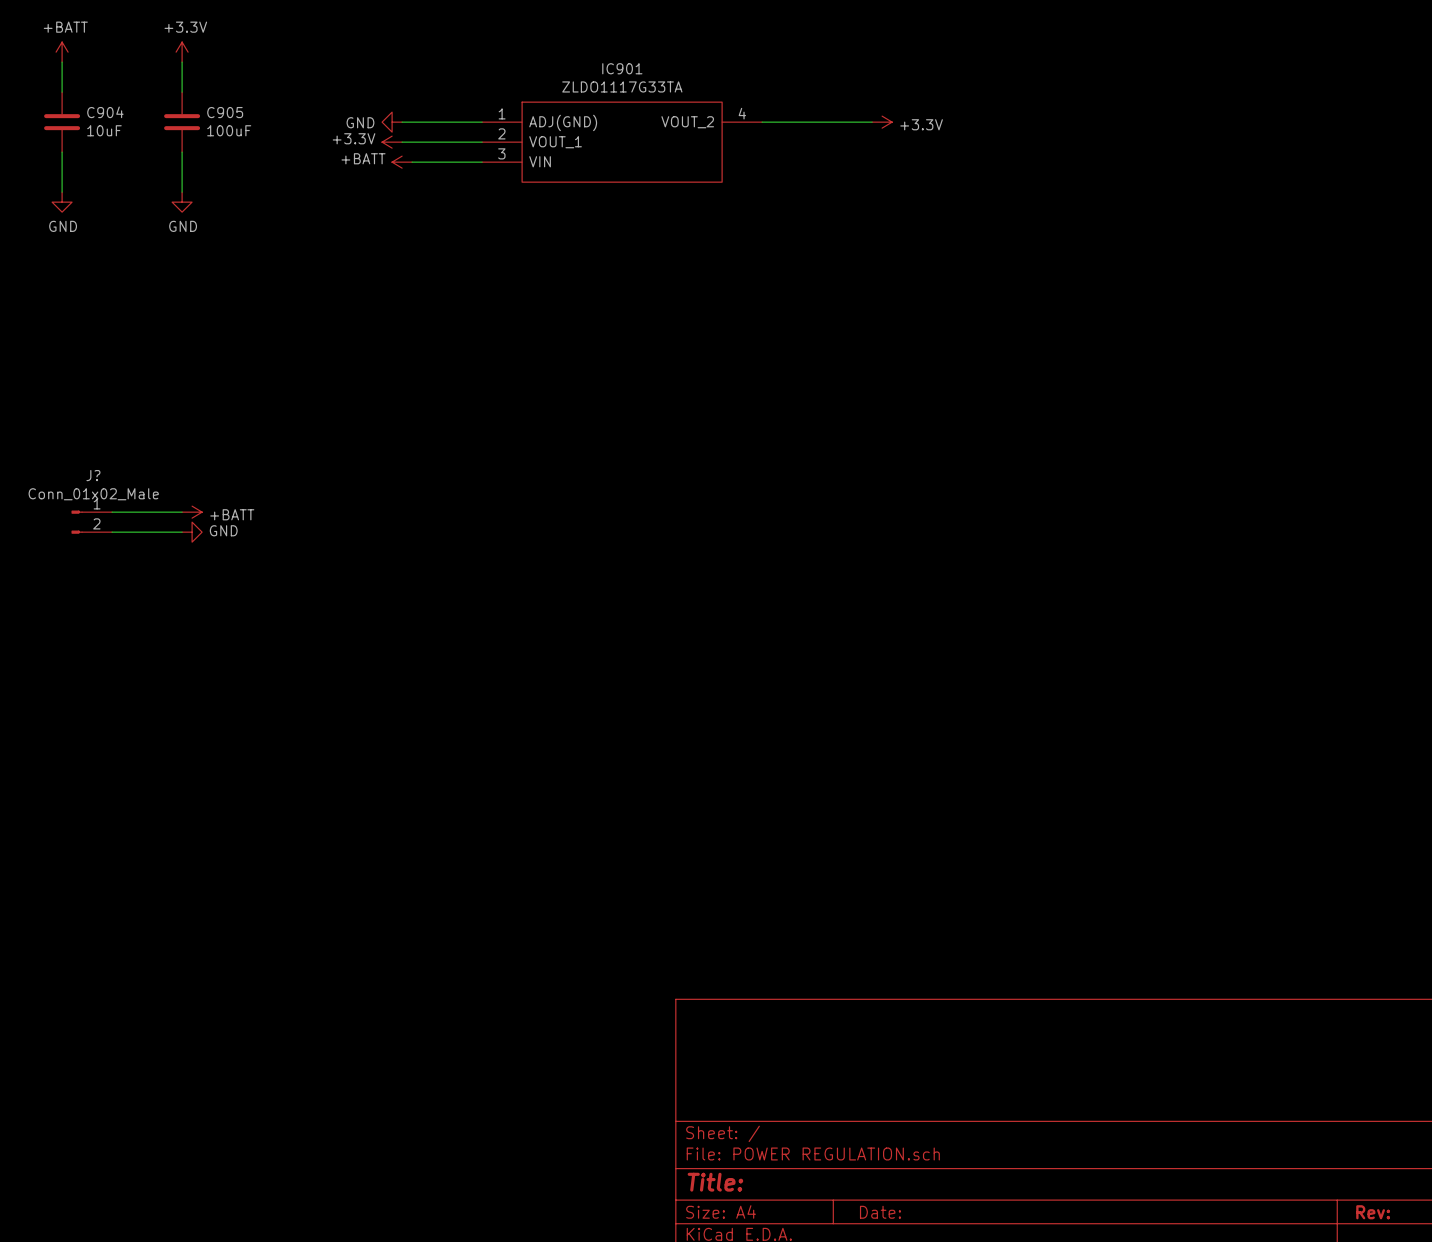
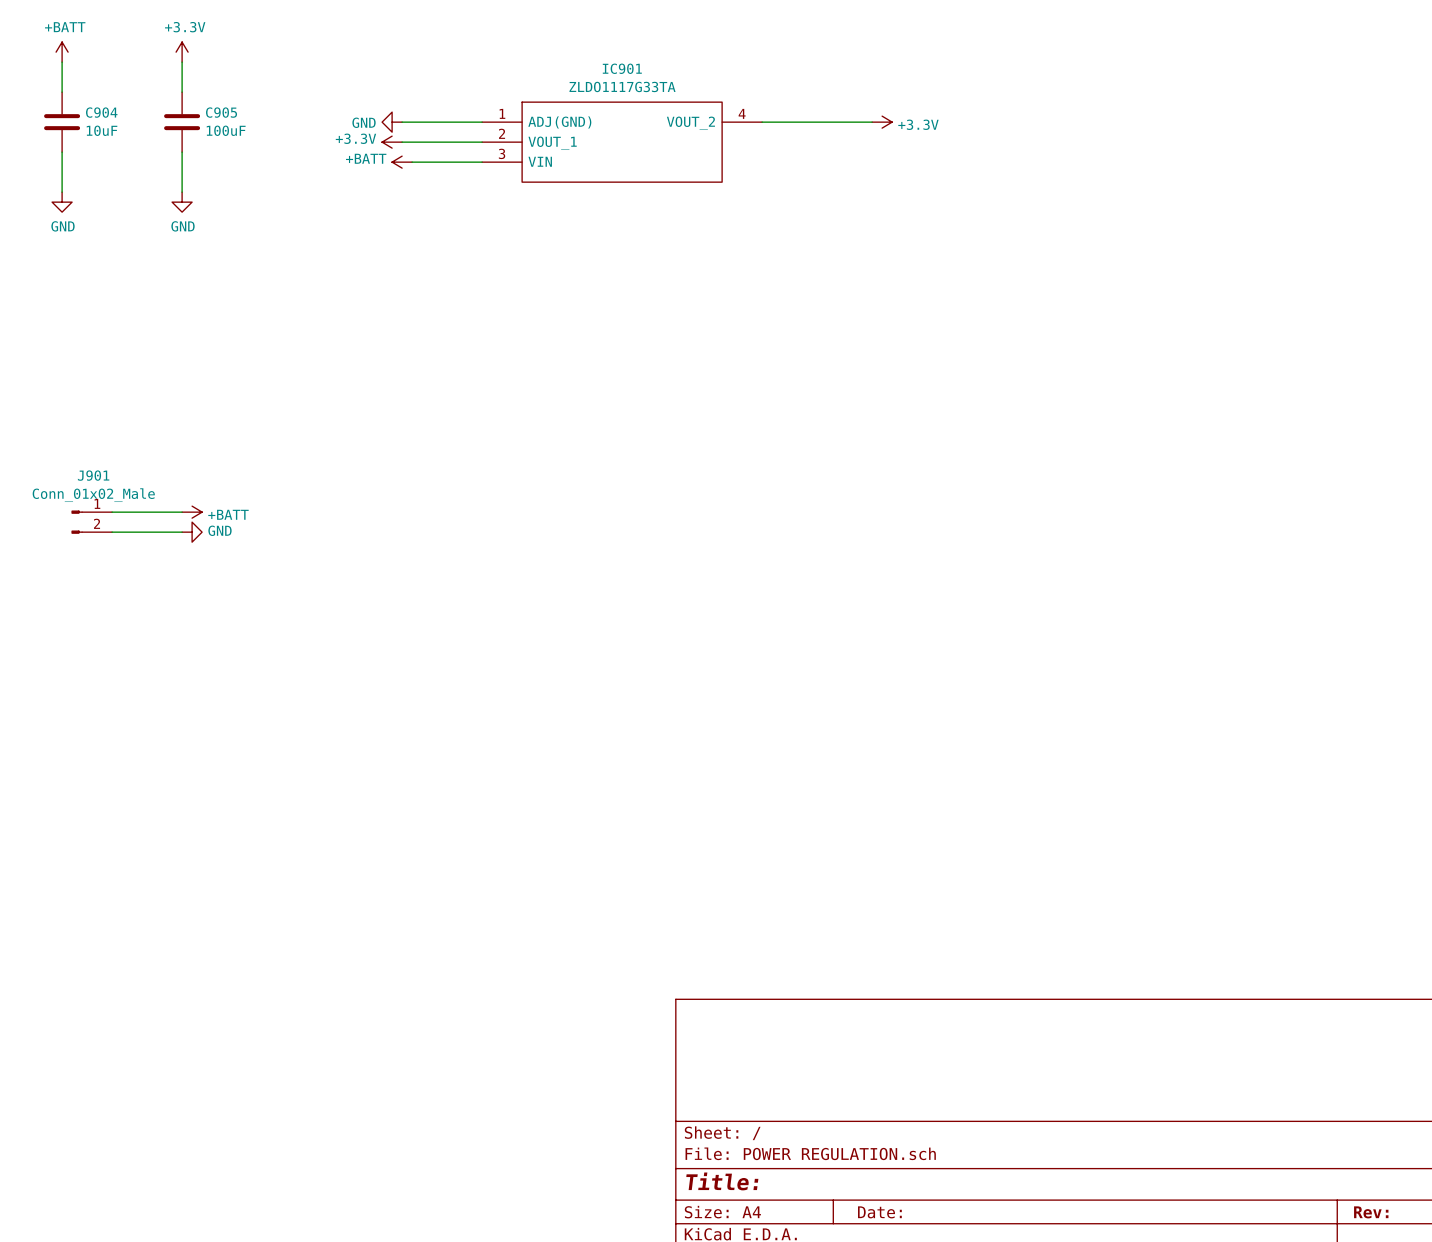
J? name: J? (93, 475) -> J901 (93, 475)

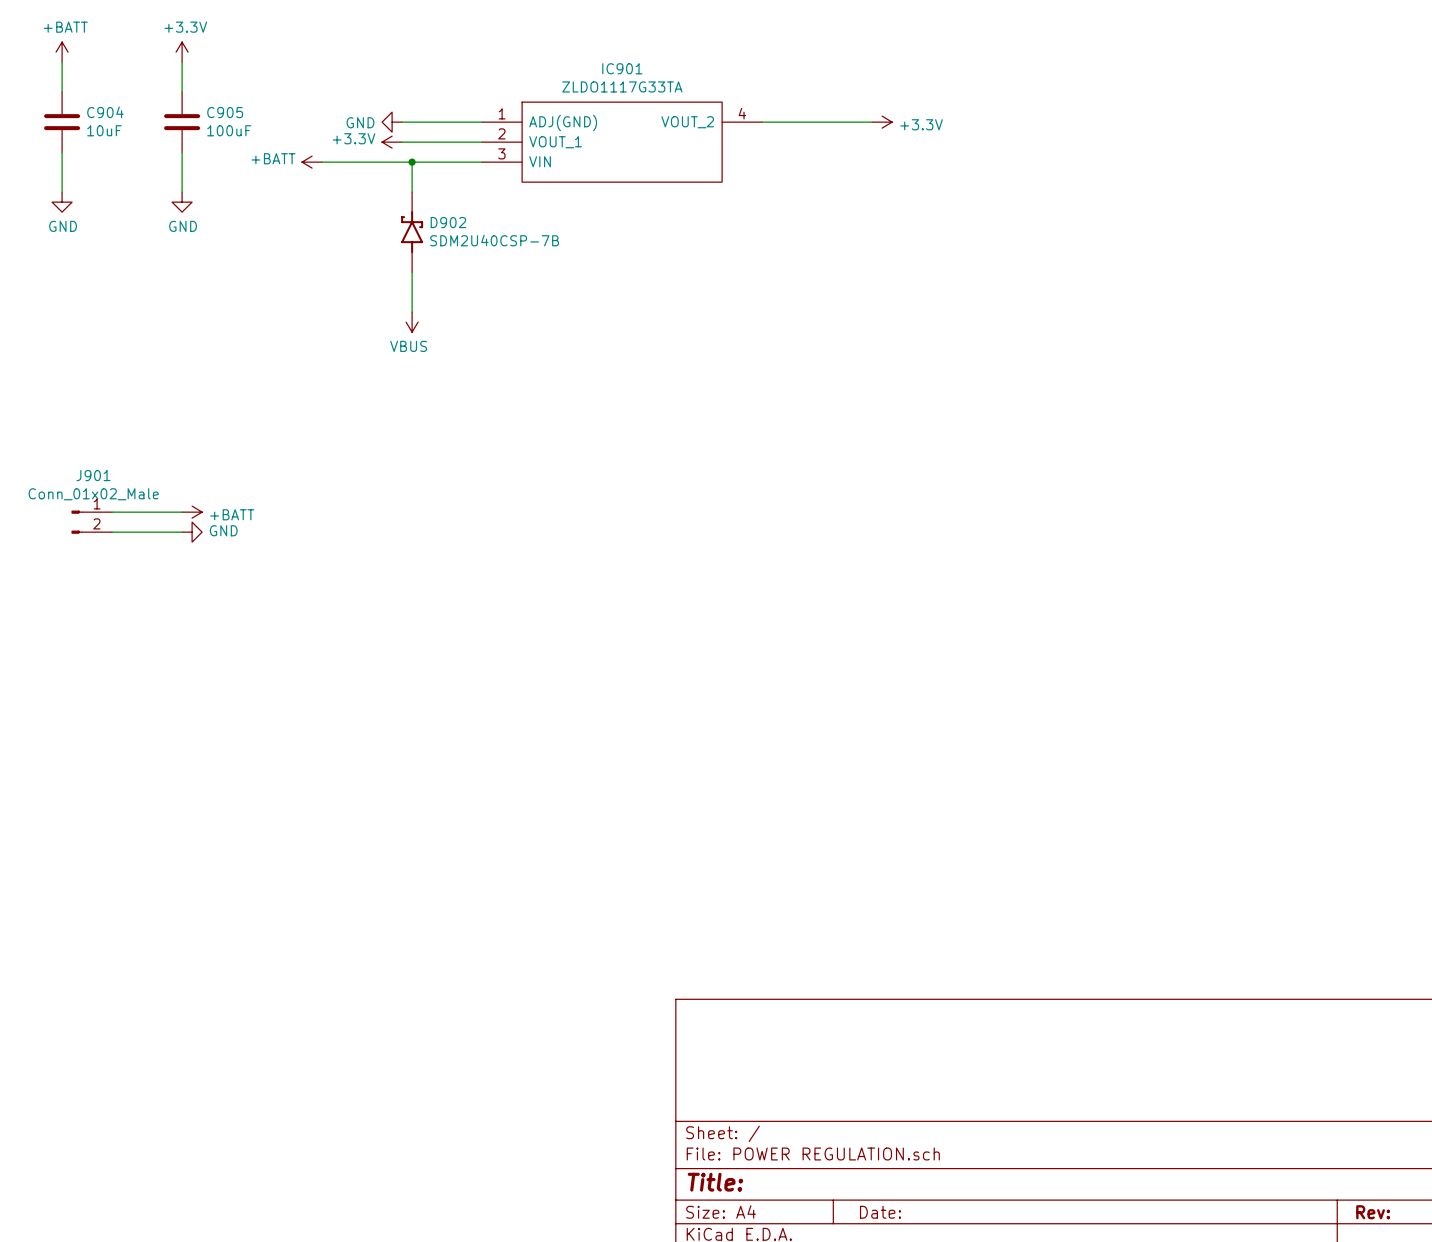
wire: none -> (322, 162) (412, 162) (412, 192)
power symbol position: +BATT (402, 162) -> +BATT (312, 162)
junction: none -> (412, 162)
D902: none -> SDM2U40CSP-7B (412, 232)
wire: none -> (412, 272) (412, 312)
power symbol: none -> VBUS (412, 322)

